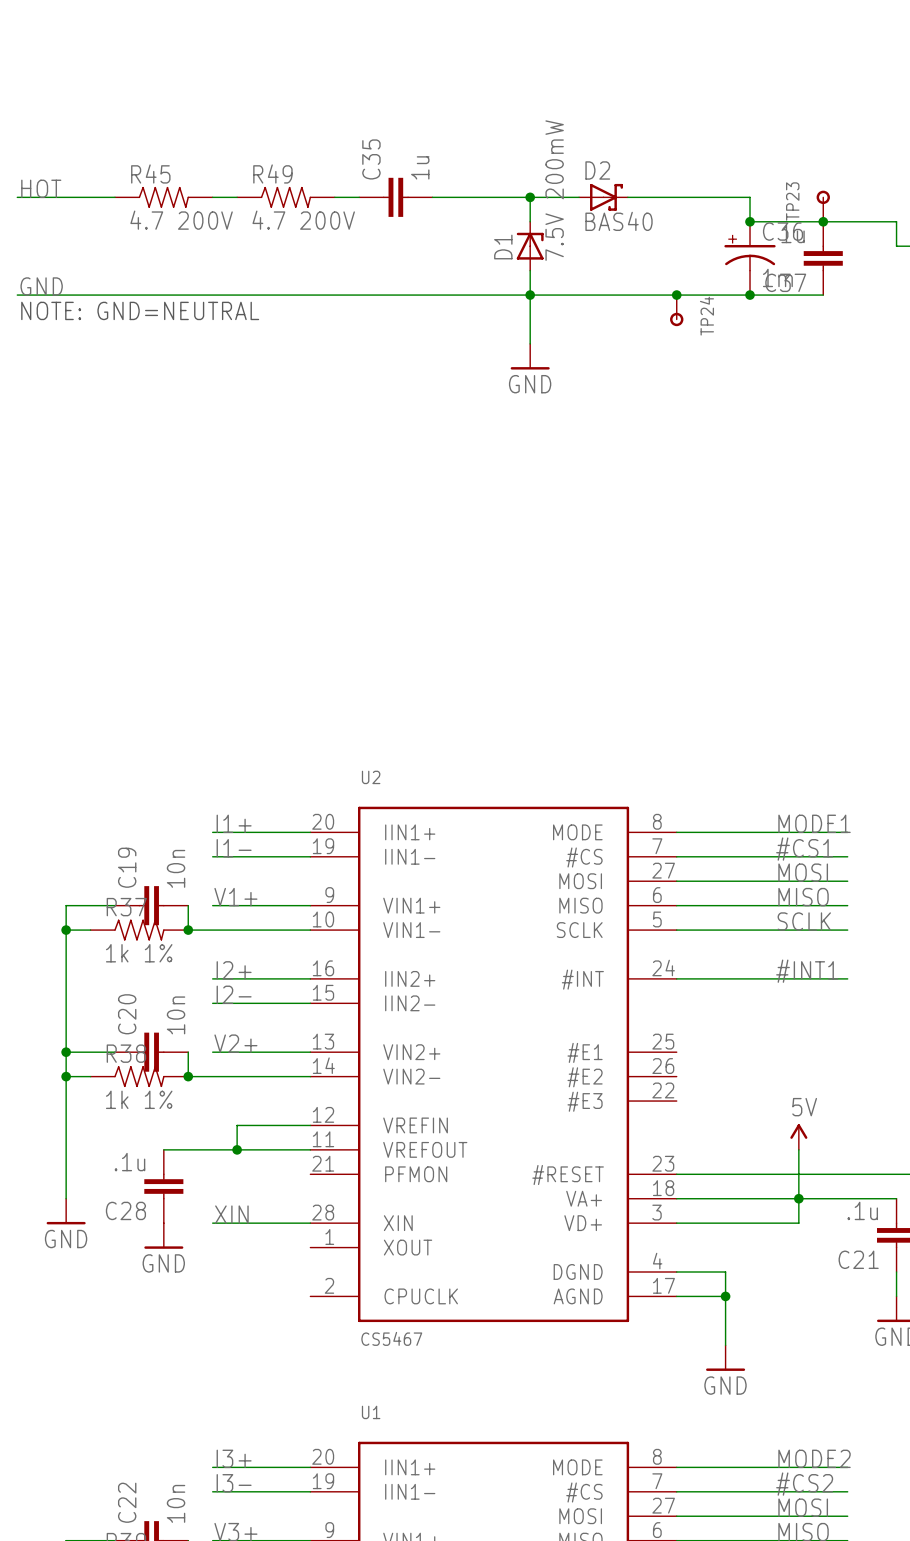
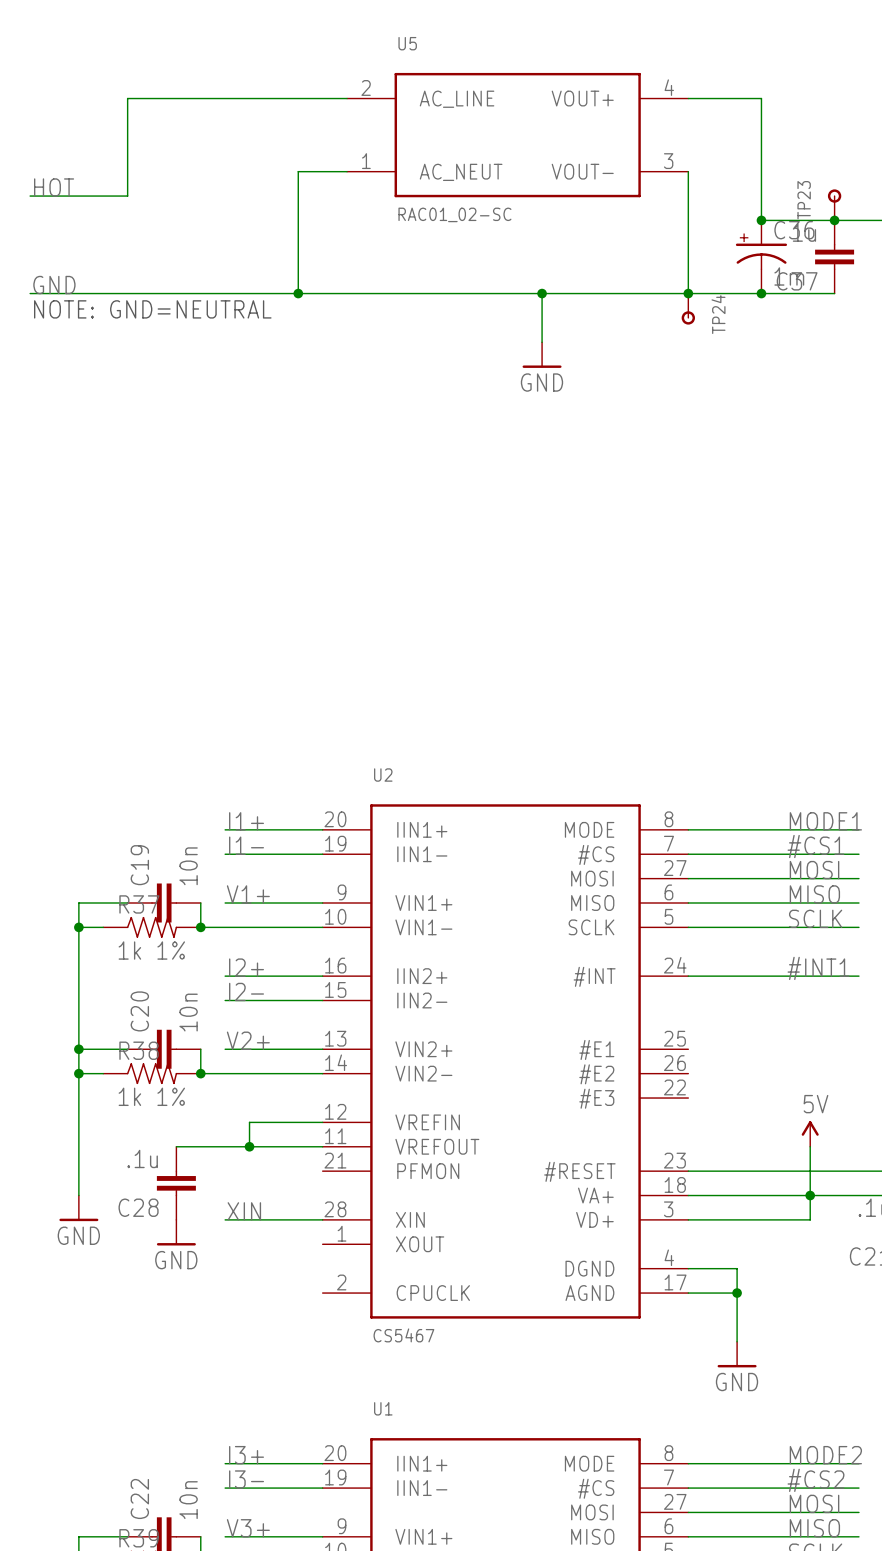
wire: none -> (347, 98) (127, 98) (127, 196)
U5: none -> RAC01_02-SC (517, 135)
wire: none -> (347, 171) (298, 171) (298, 293)
wire: none -> (688, 171) (688, 293)
R45: 4.7 200V (163, 197) -> none
wire: (212, 197) (237, 197) -> none
R49: 4.7 200V (285, 197) -> none
wire: (334, 197) (359, 197) -> none
C35: 1u (395, 197) -> none
wire: (530, 197) (530, 221) -> none
junction: (530, 197) -> none
D2: BAS40 (603, 197) -> none
wire: (627, 197) (750, 197) -> (688, 98) (761, 98) (761, 196)
D1: 7.5V 200mW (530, 246) -> none
wire: (530, 270) (530, 295) -> none
junction: none -> (298, 293)

